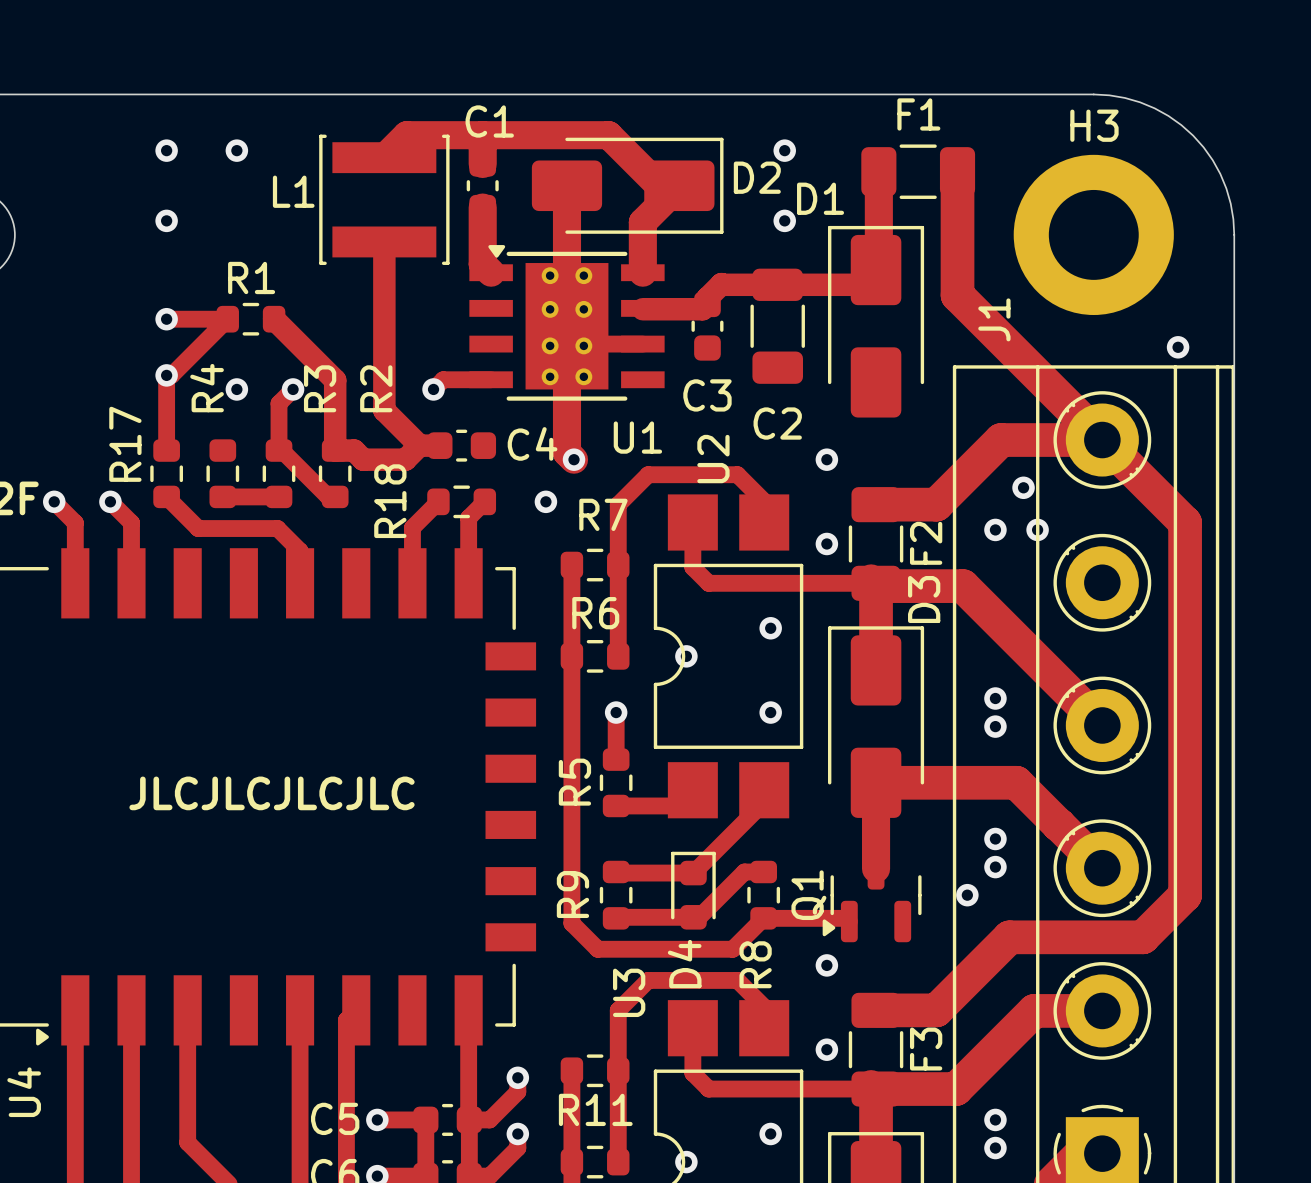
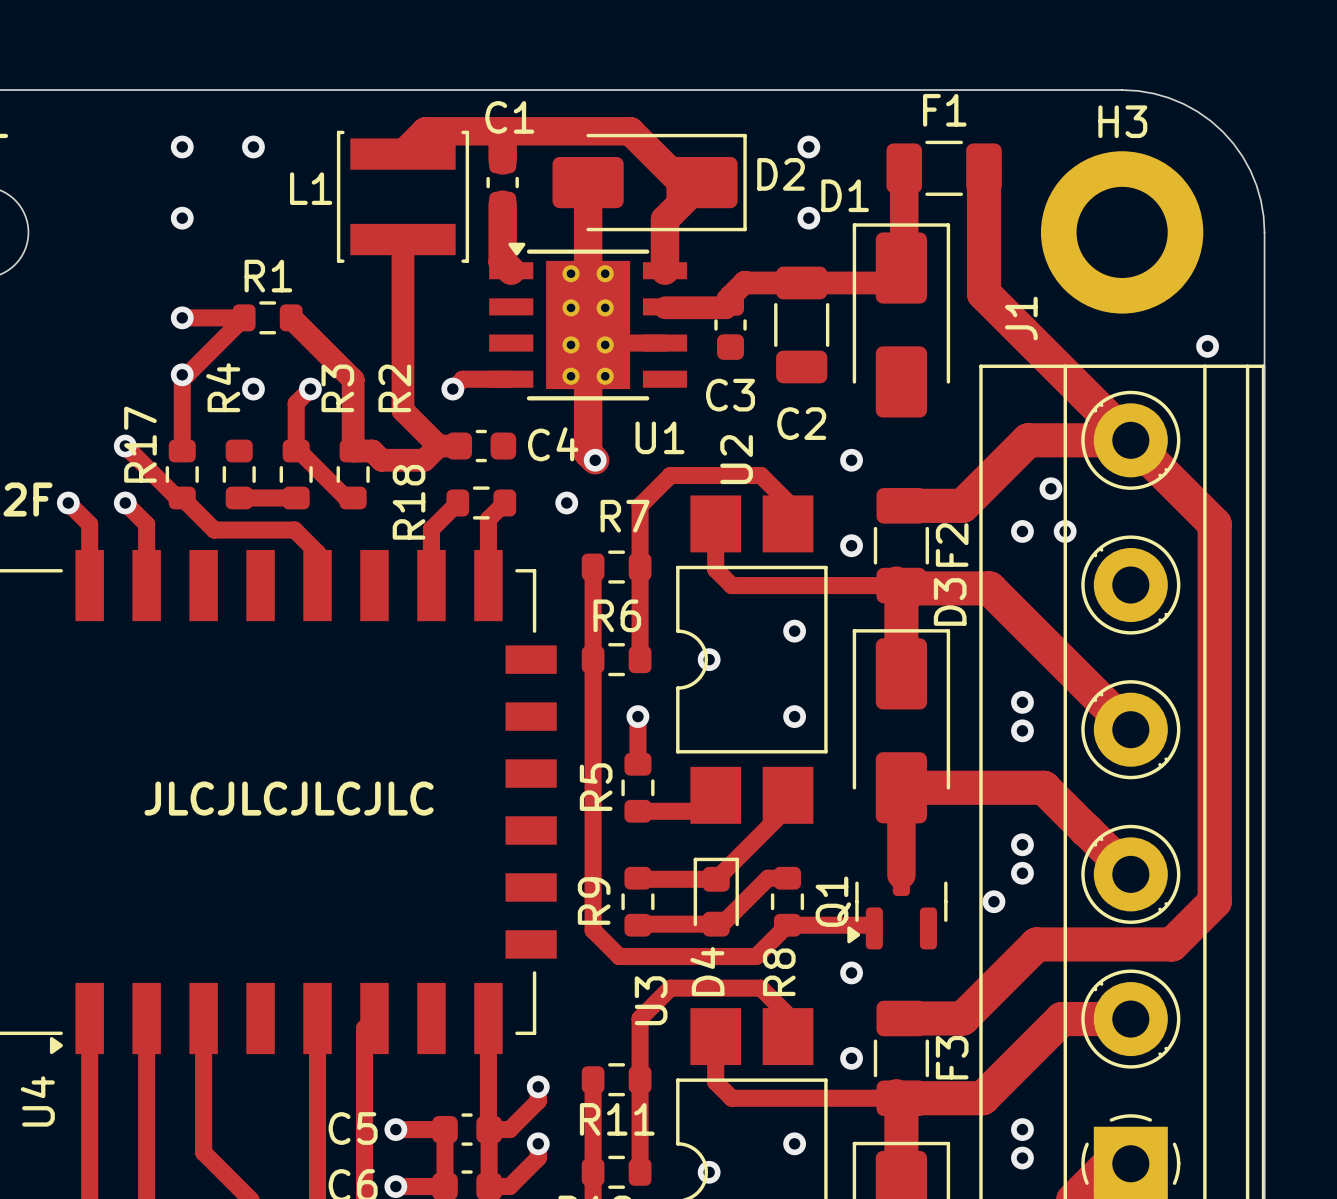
track: none -> (125, 446) (177, 498) (182, 498)
via: none -> (125, 446)

